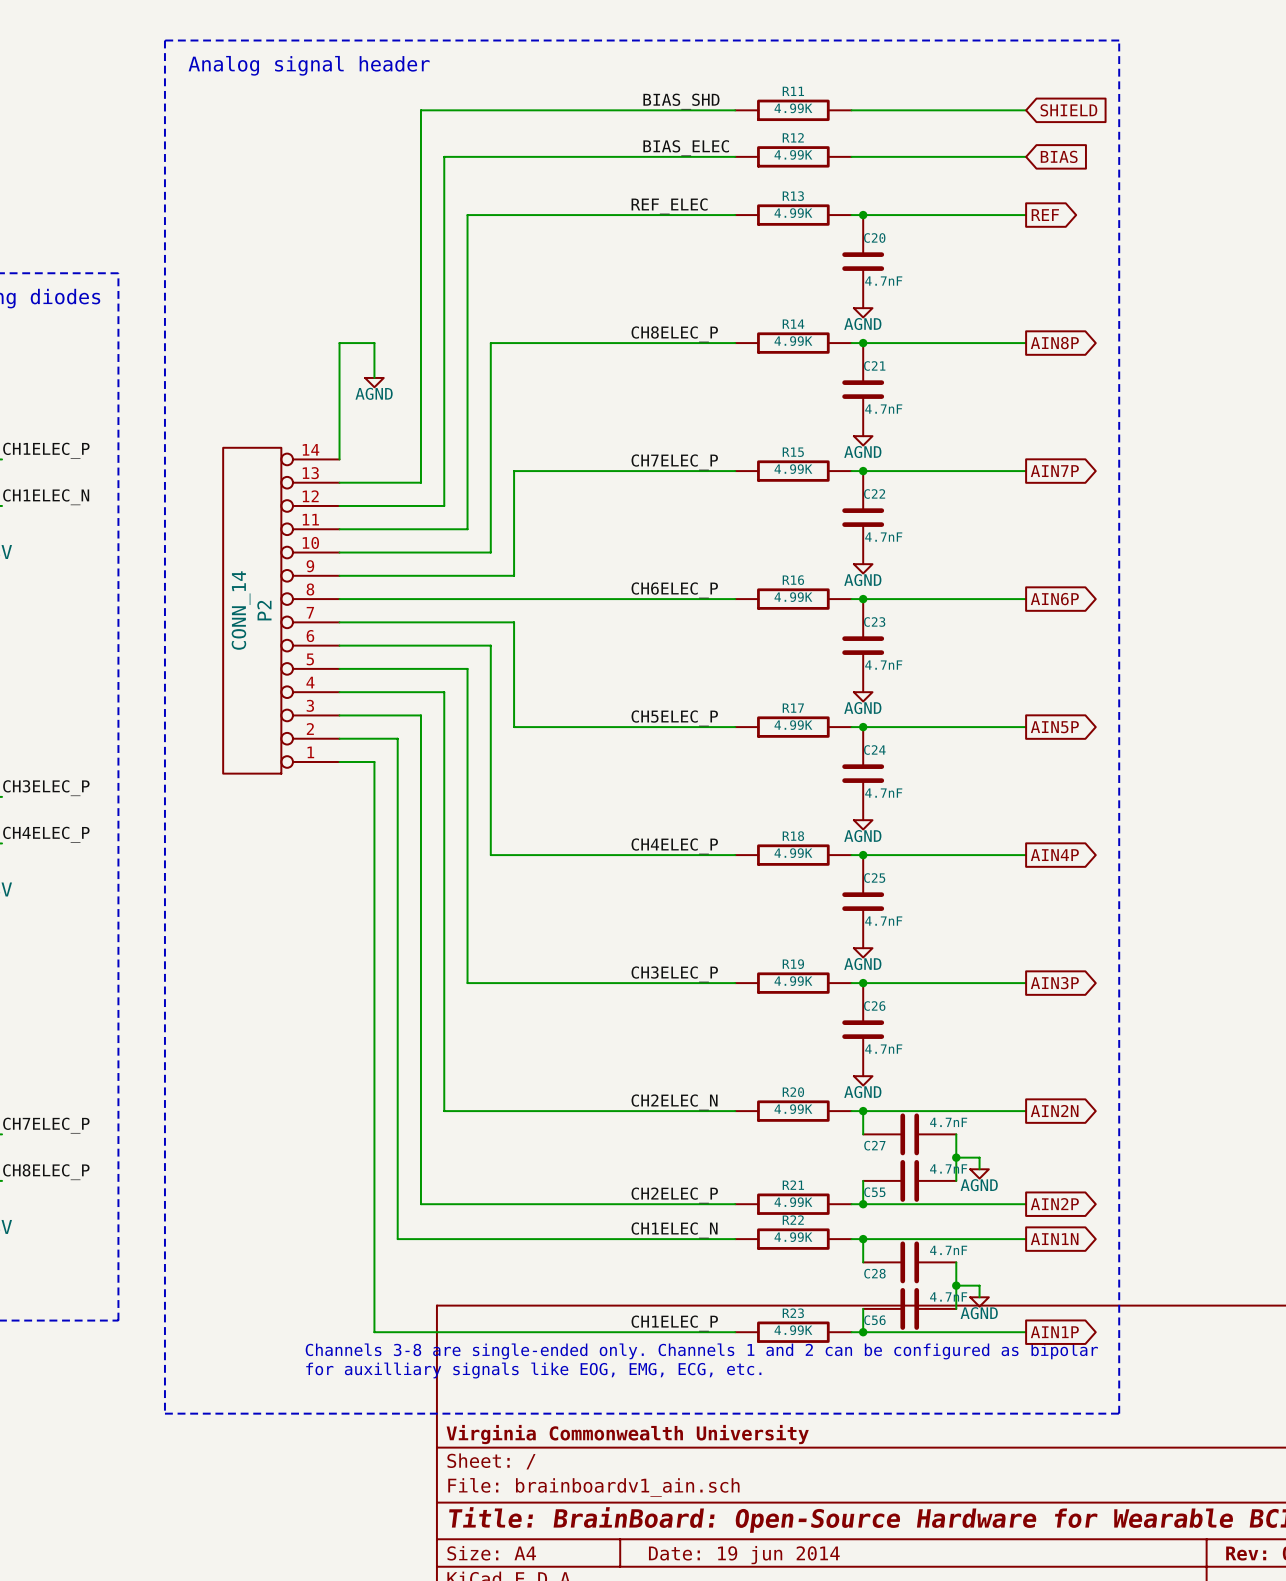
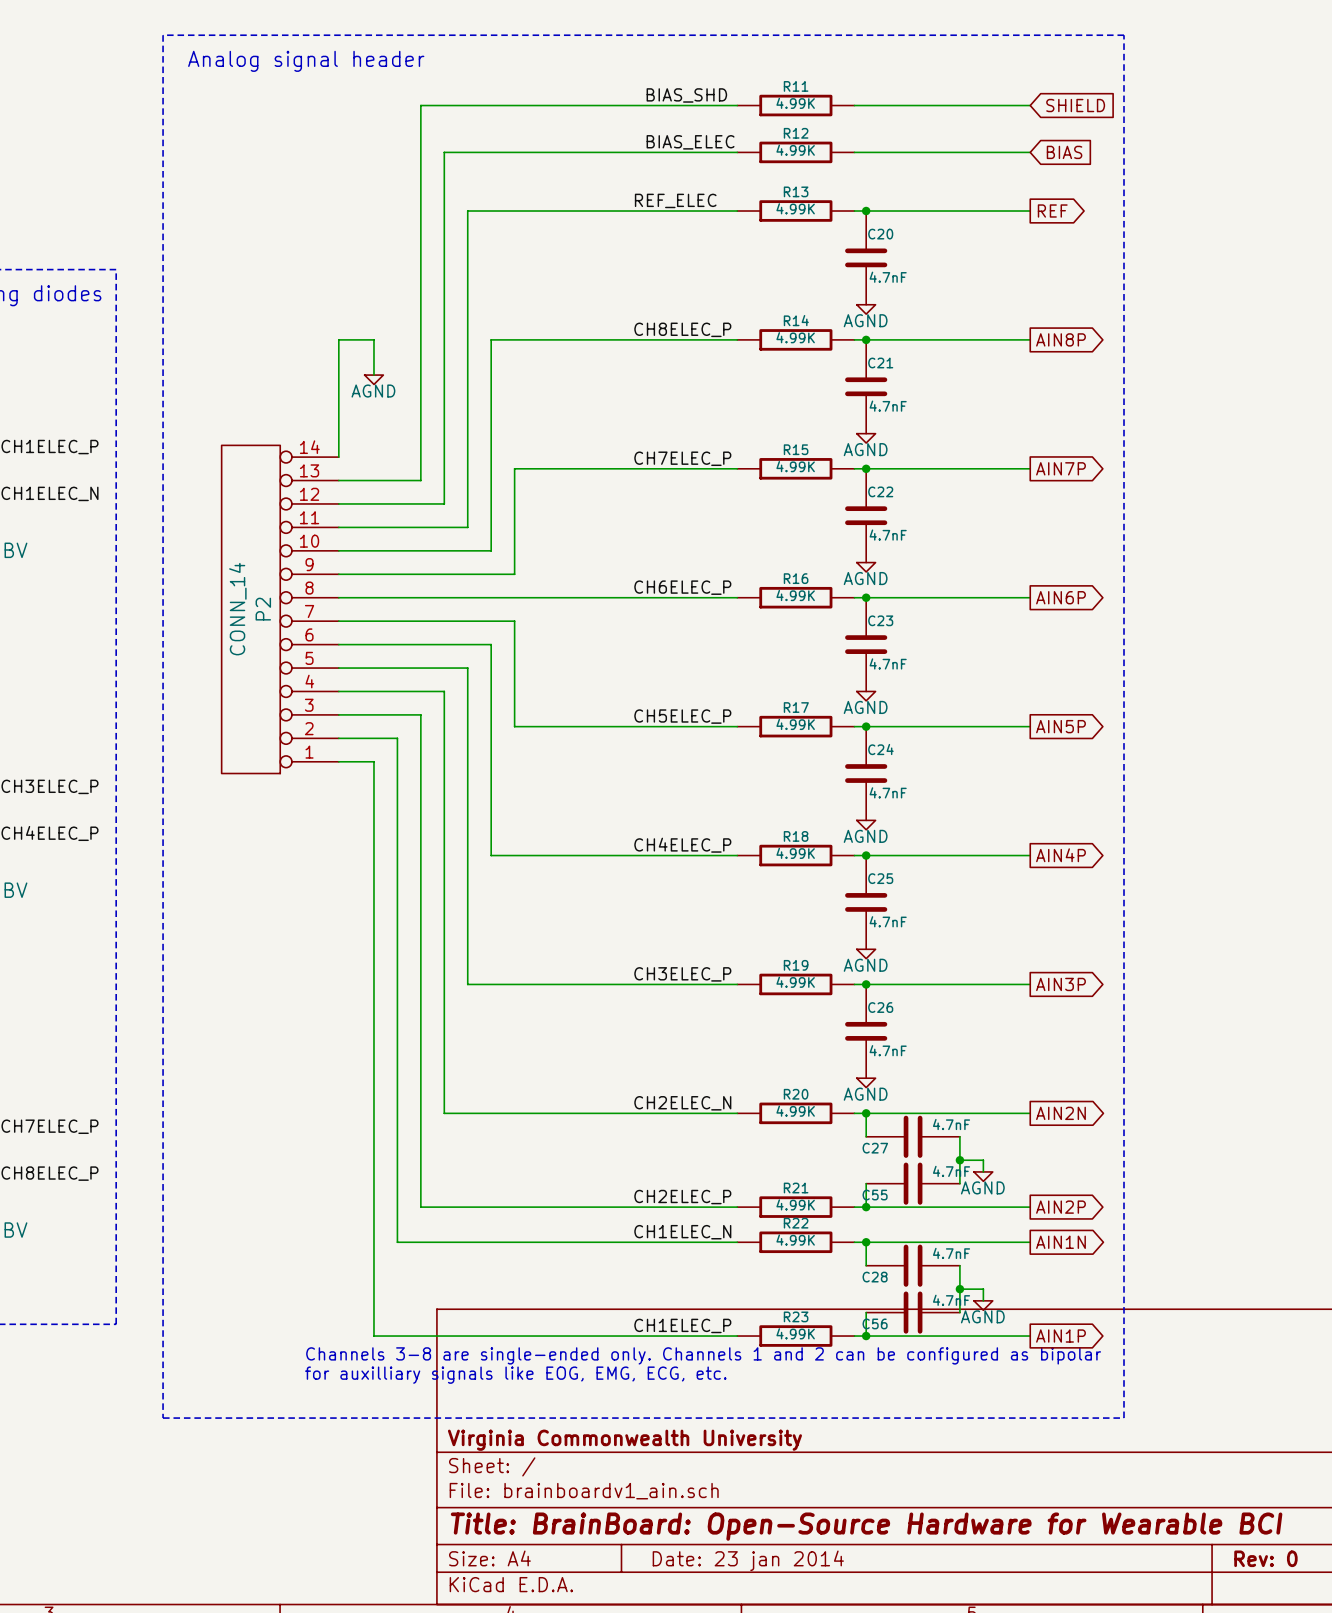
title block: Date: 19 jun 2014 (744, 1555) -> Date: 23 jan 2014 (748, 1560)

